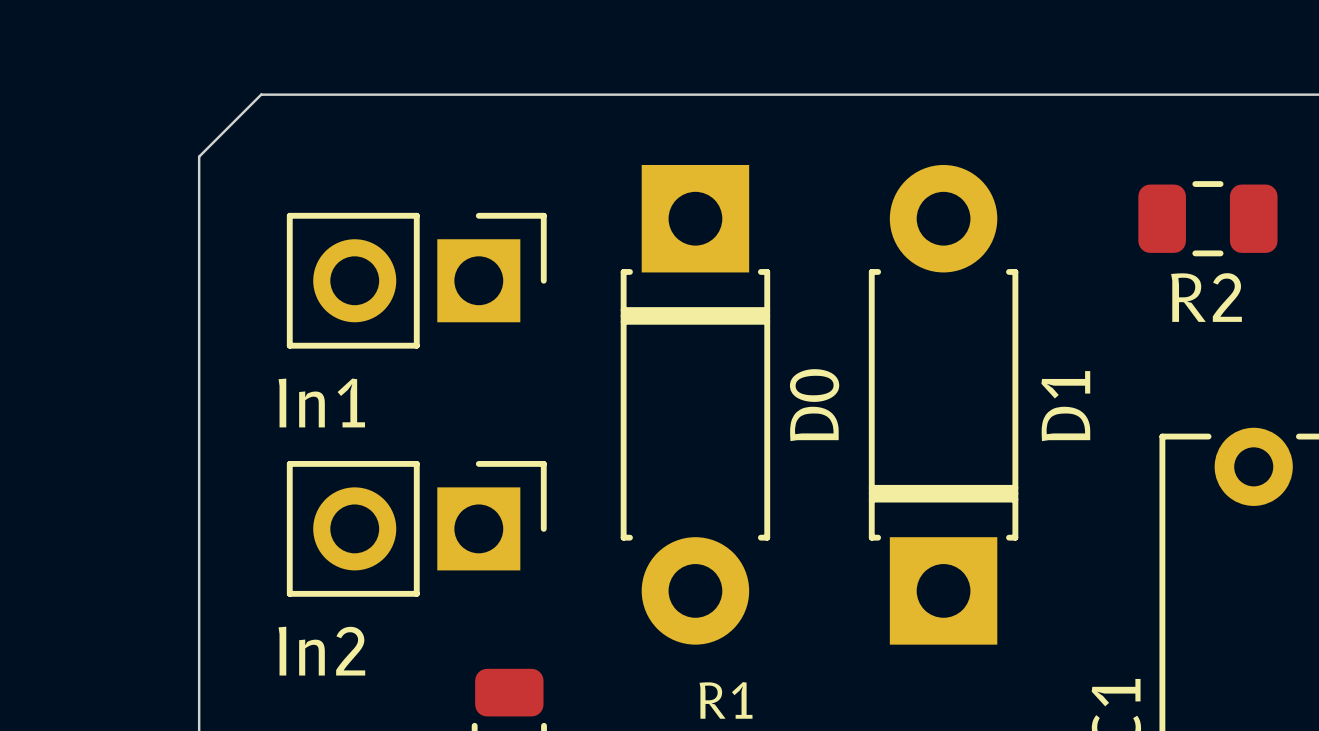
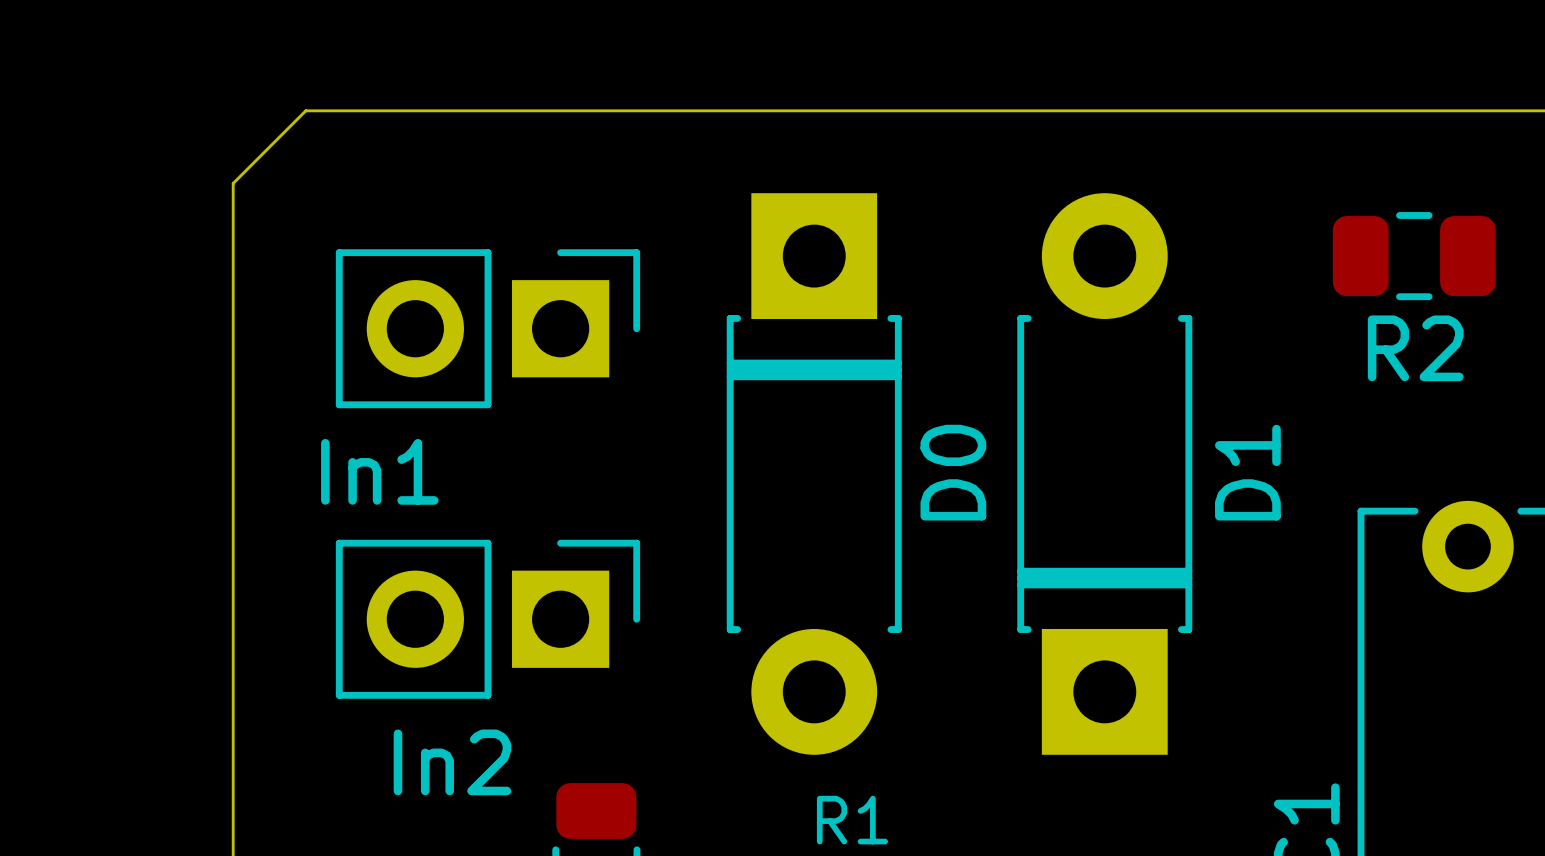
In2 name position: In2 (321, 651) -> In2 (452, 762)

